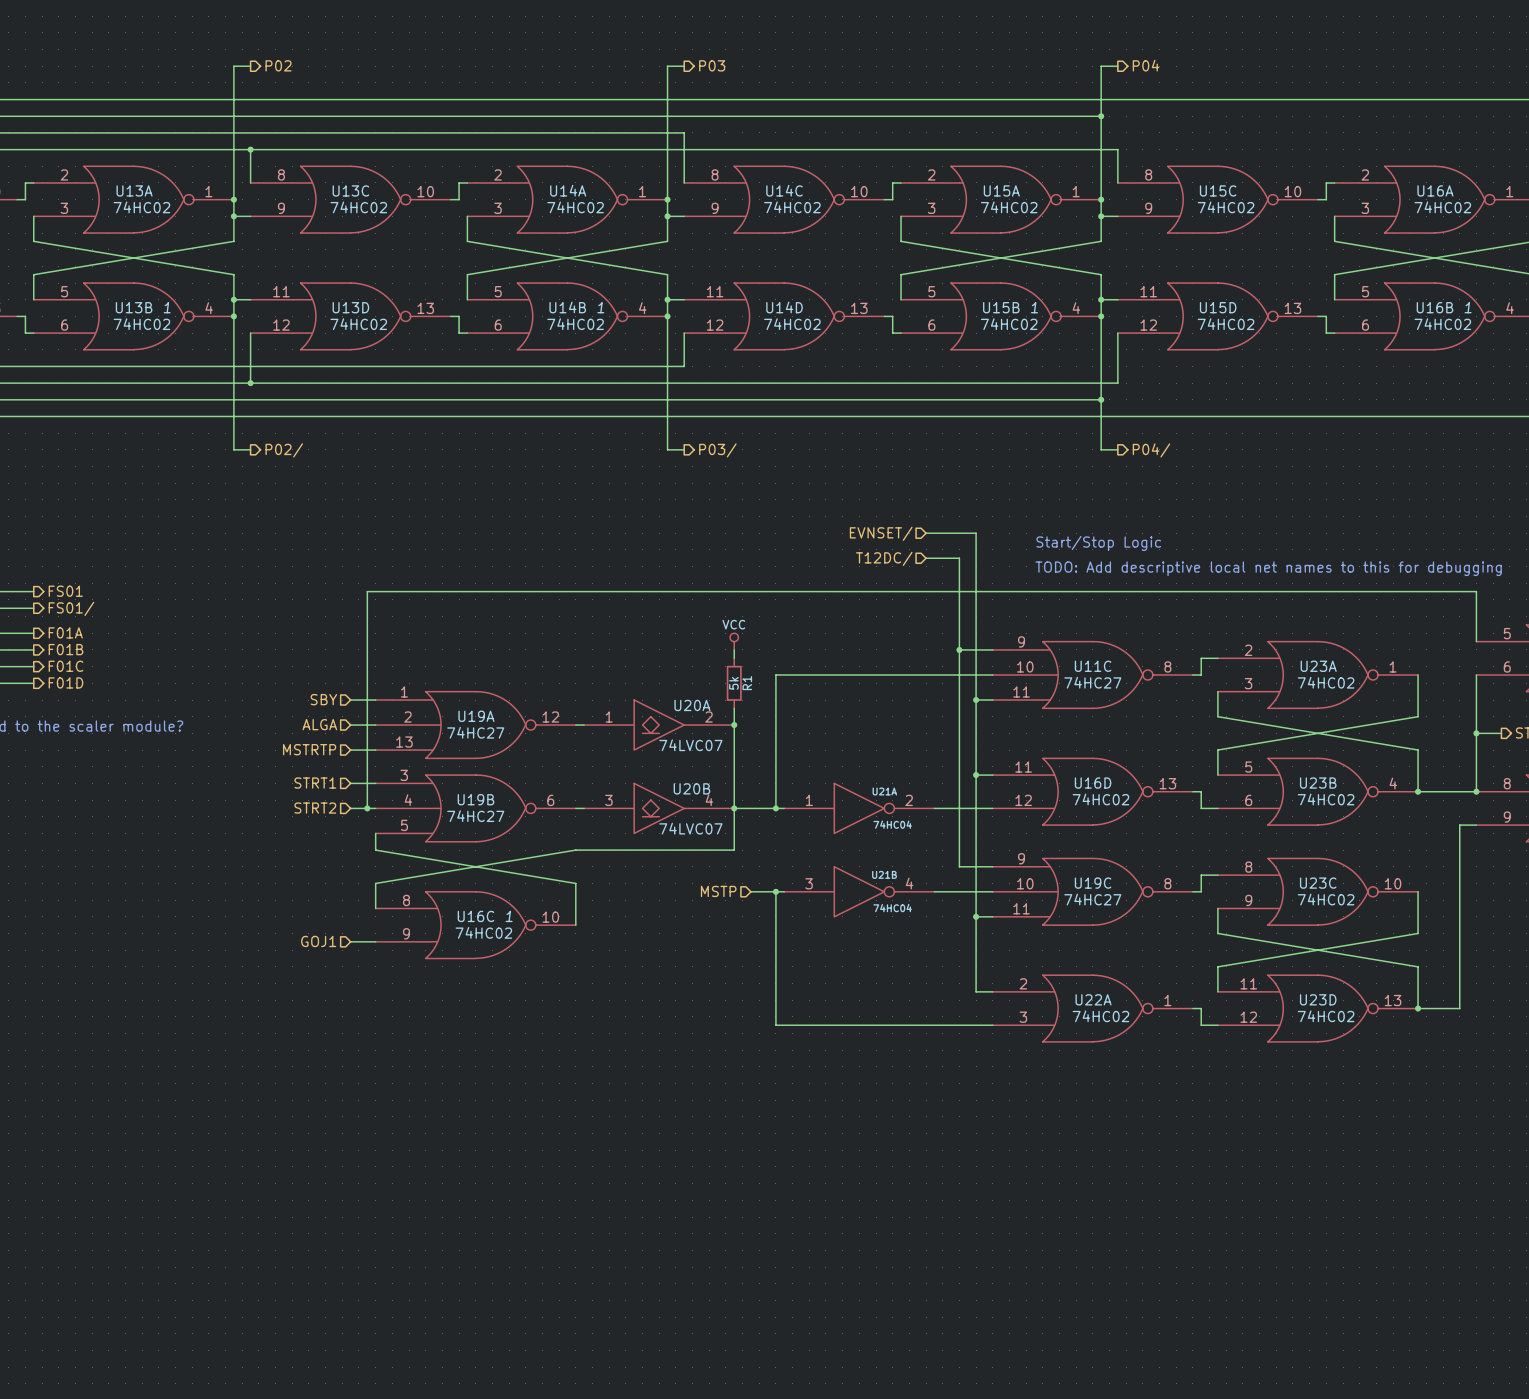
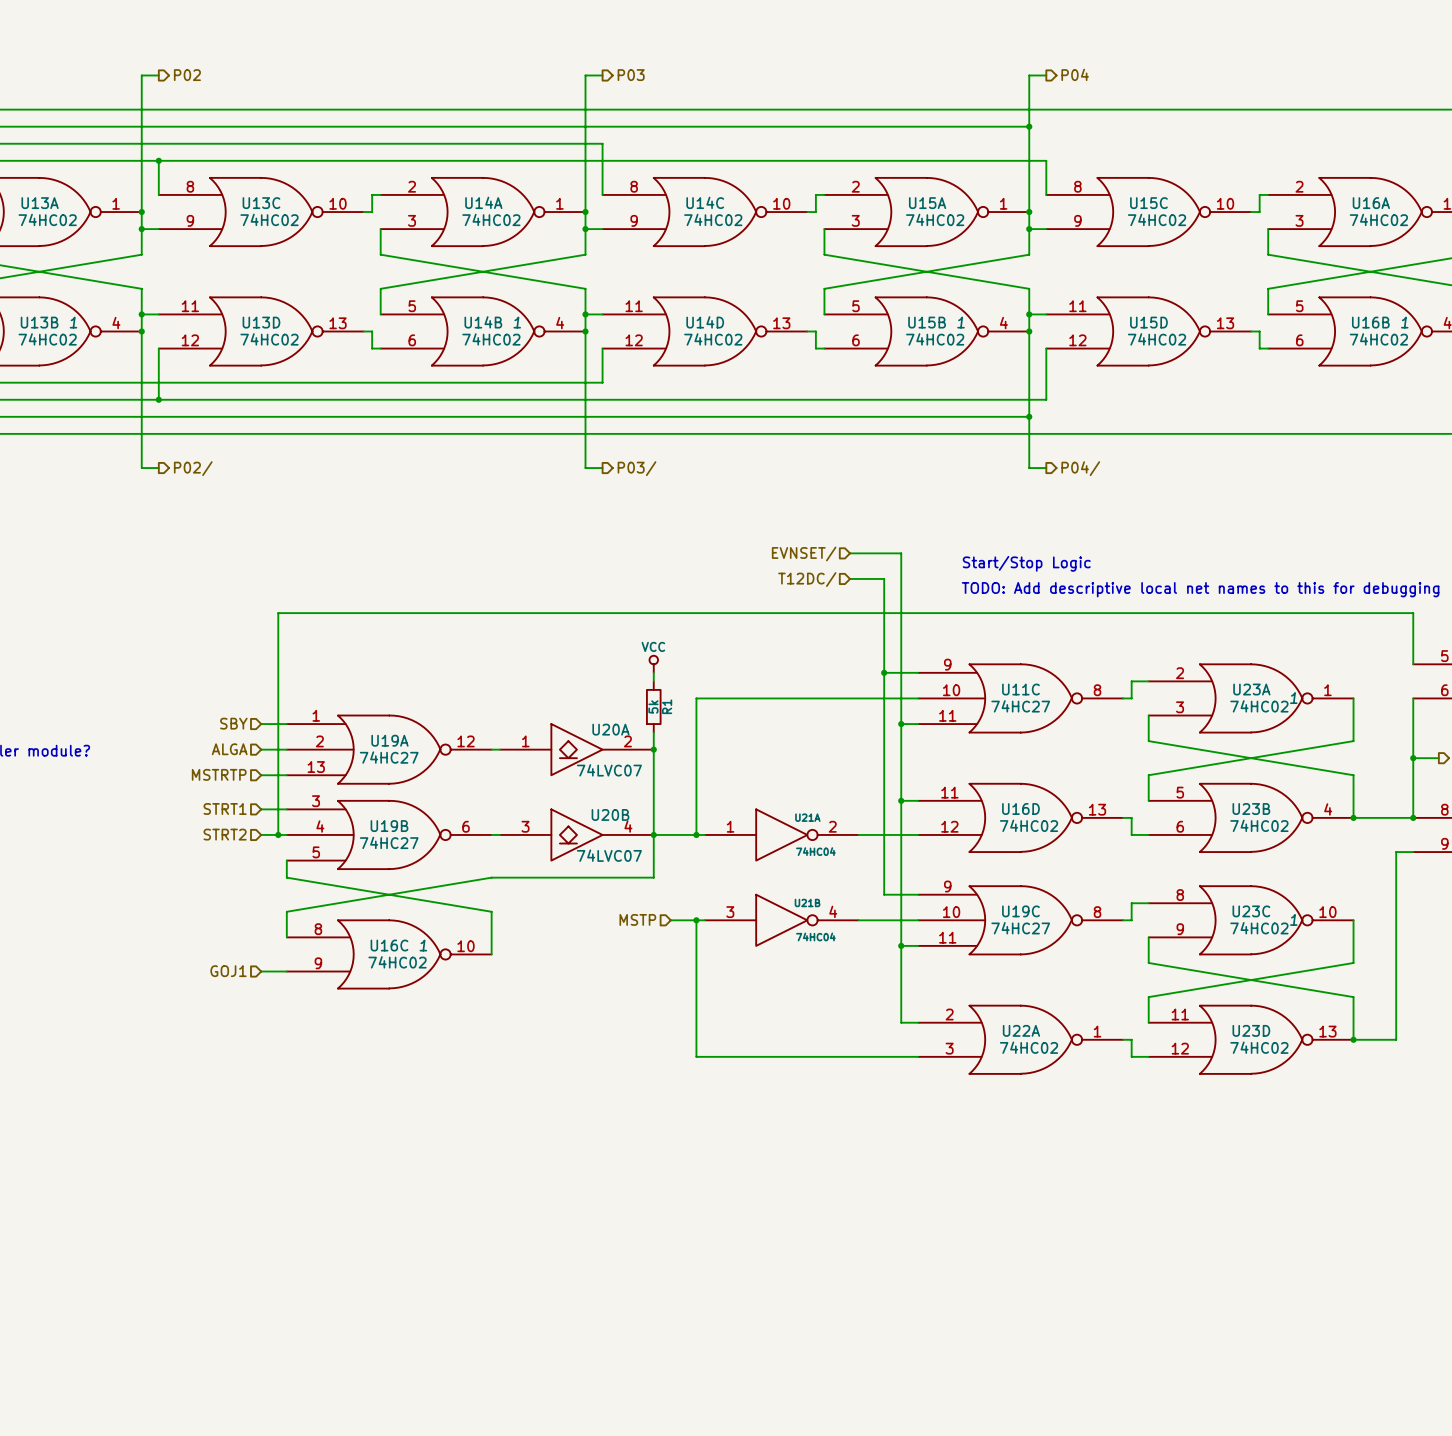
U23A text: none -> 1 (1293, 698)
U23C text: none -> 1 (1293, 919)

